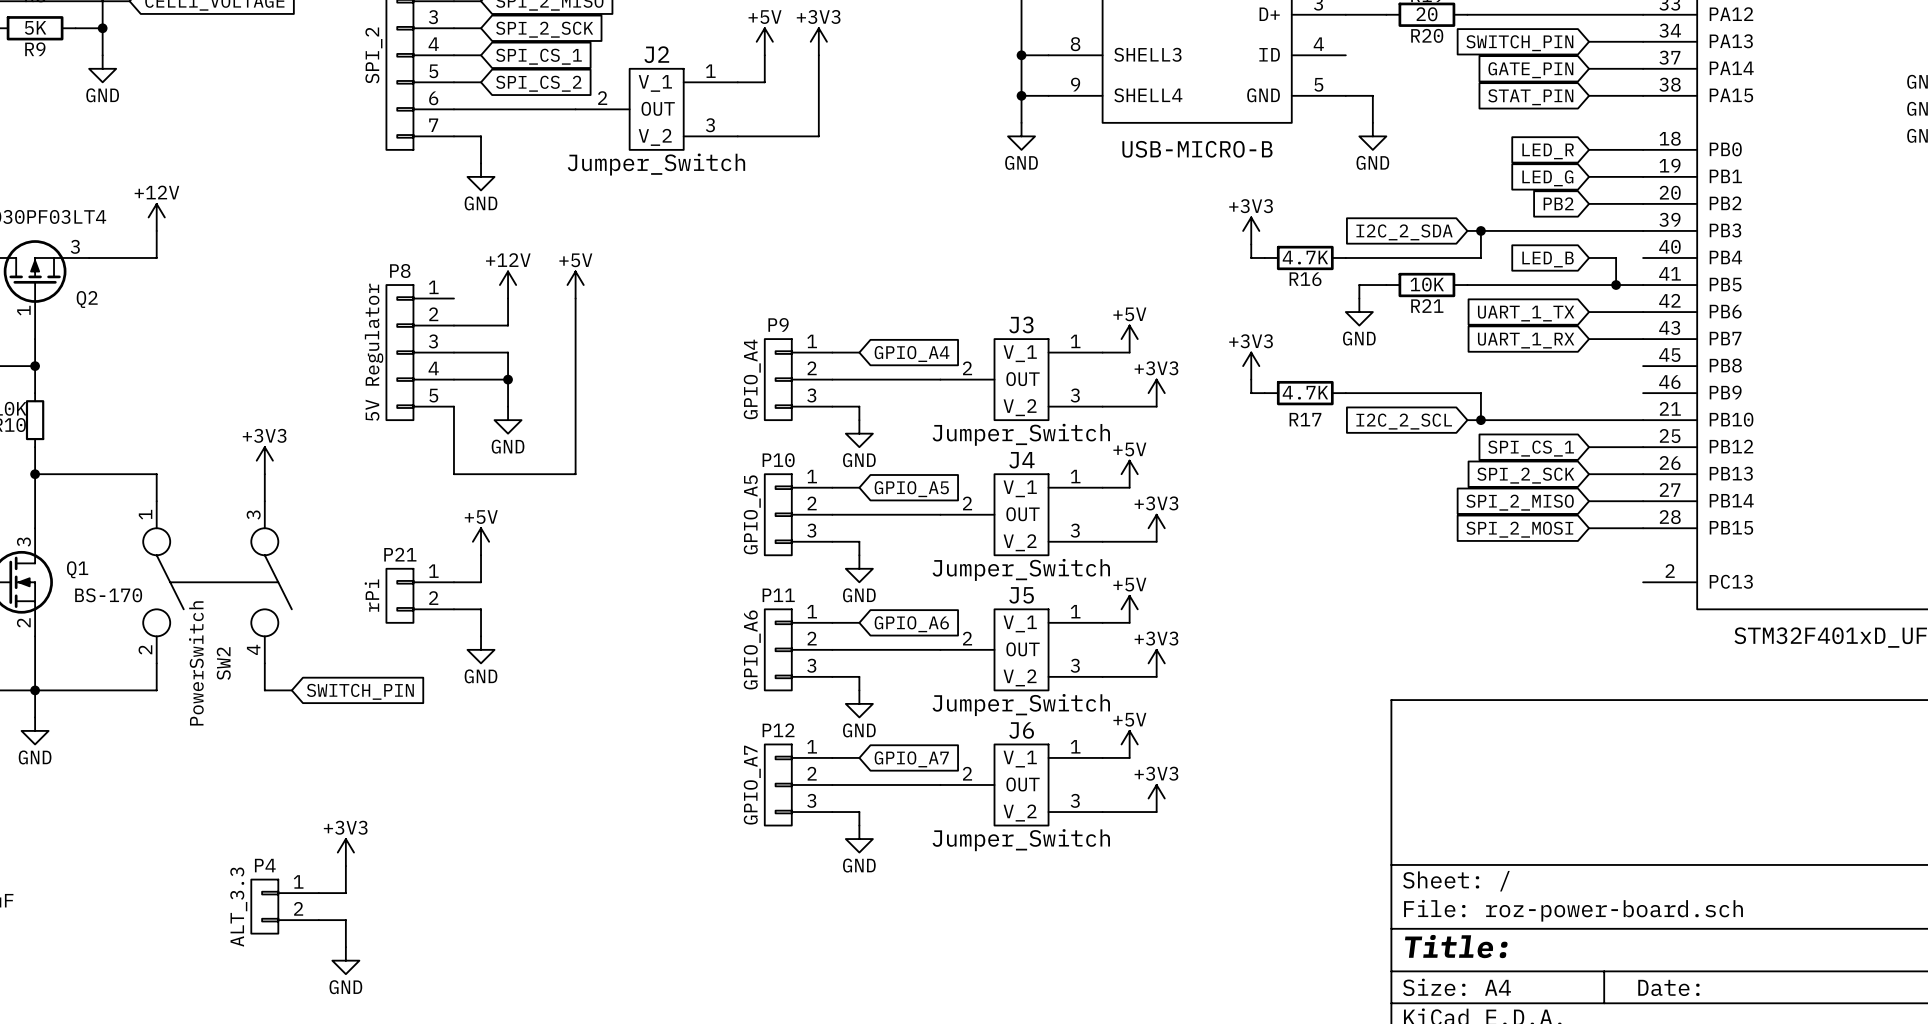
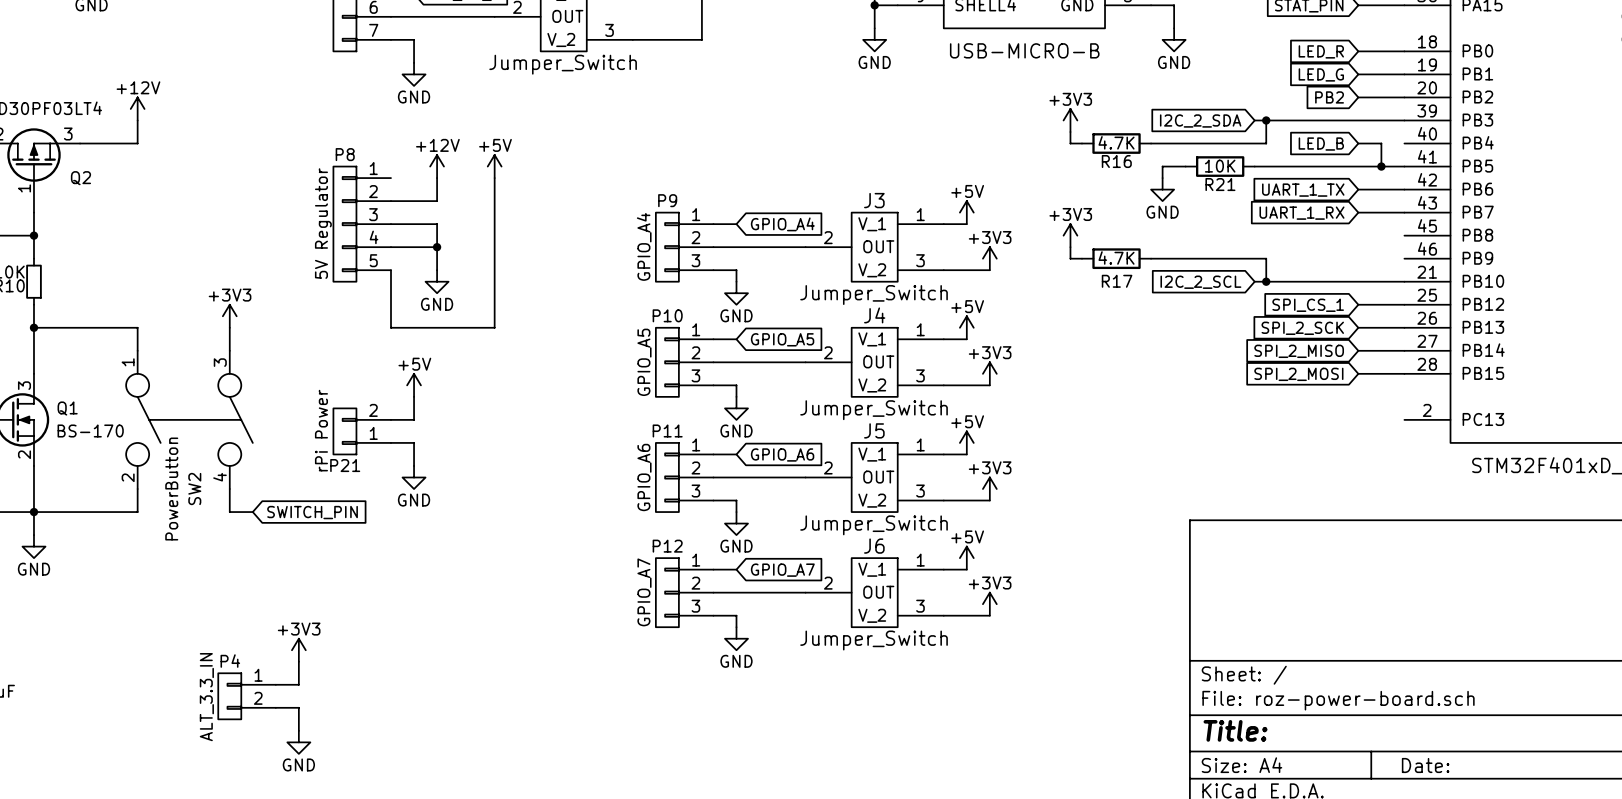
P21 value: rPi (371, 595) -> rPi Power (321, 430)
P21 flip: as is (399, 595) -> up-down (344, 431)
SW2 value: PowerSwitch (196, 663) -> PowerButton (171, 489)
P4 value: ALT_3.3 (238, 907) -> ALT_3.3_IN (206, 697)

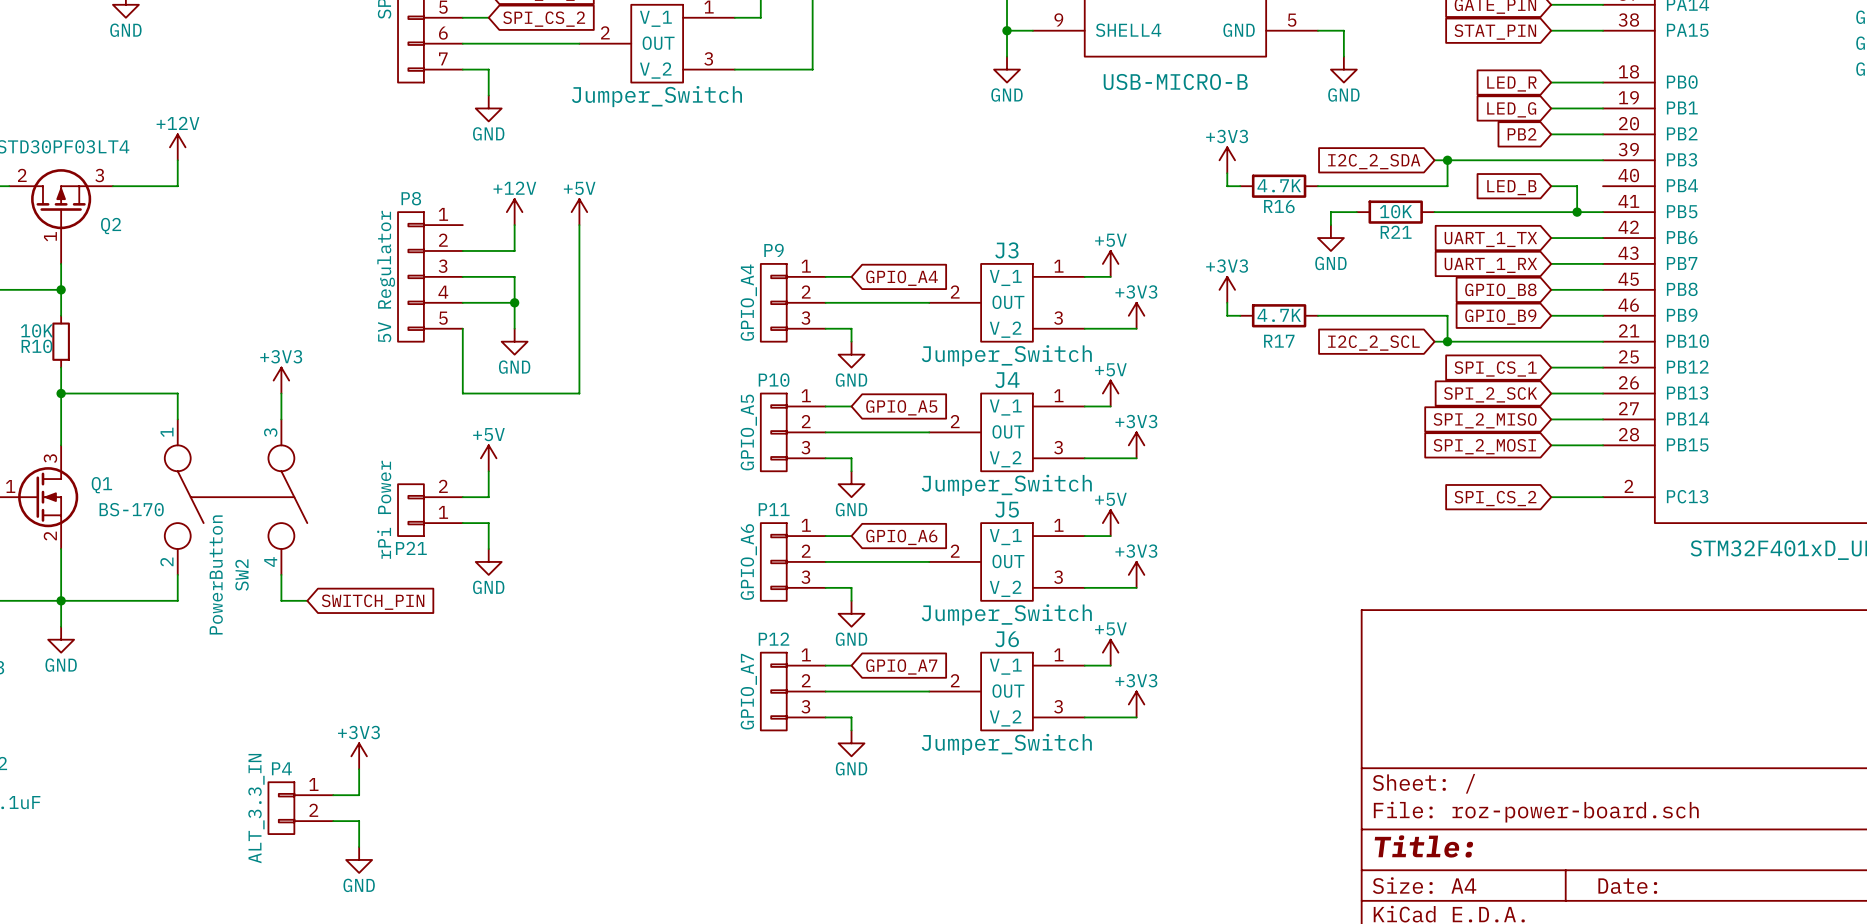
wire: none -> (1551, 289) (1603, 289)
global label: none -> GPIO_B8 (1500, 291)
wire: none -> (1551, 315) (1603, 315)
global label: none -> GPIO_B9 (1500, 317)
wire: none -> (1551, 497) (1603, 497)
global label: none -> SPI_CS_2 (1495, 498)

